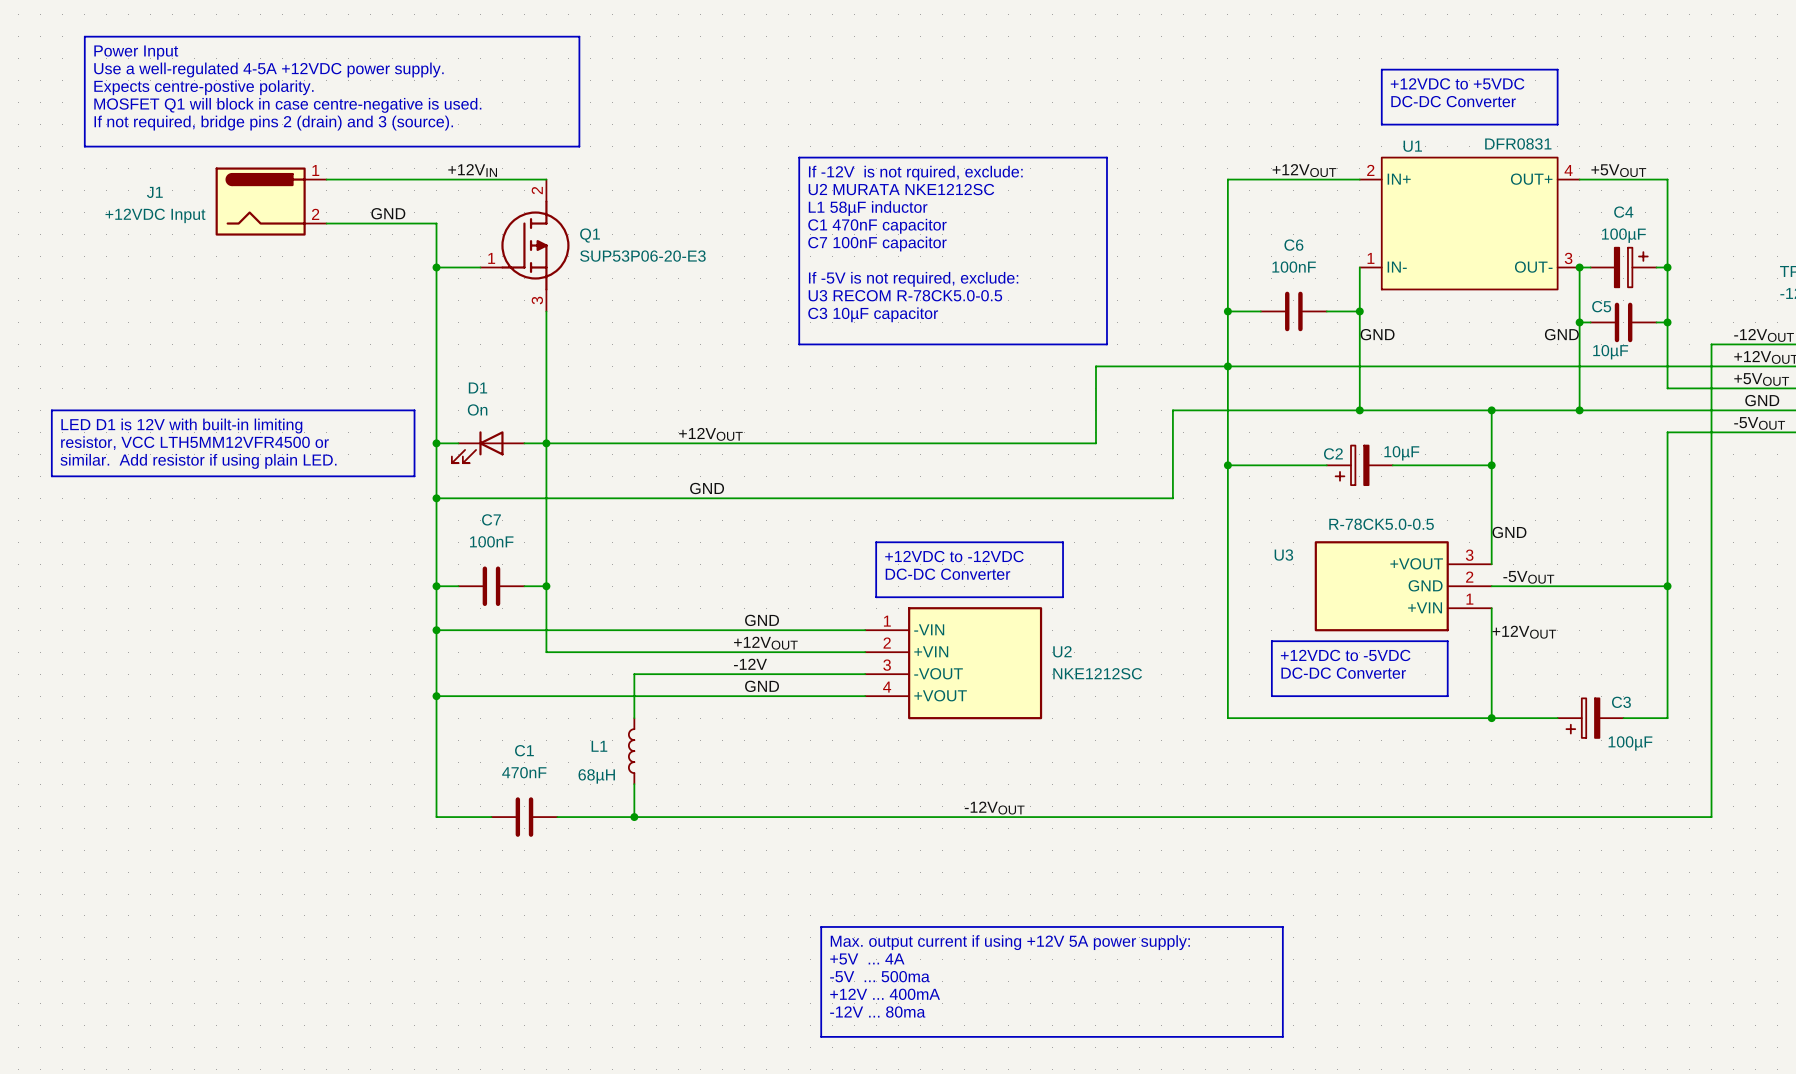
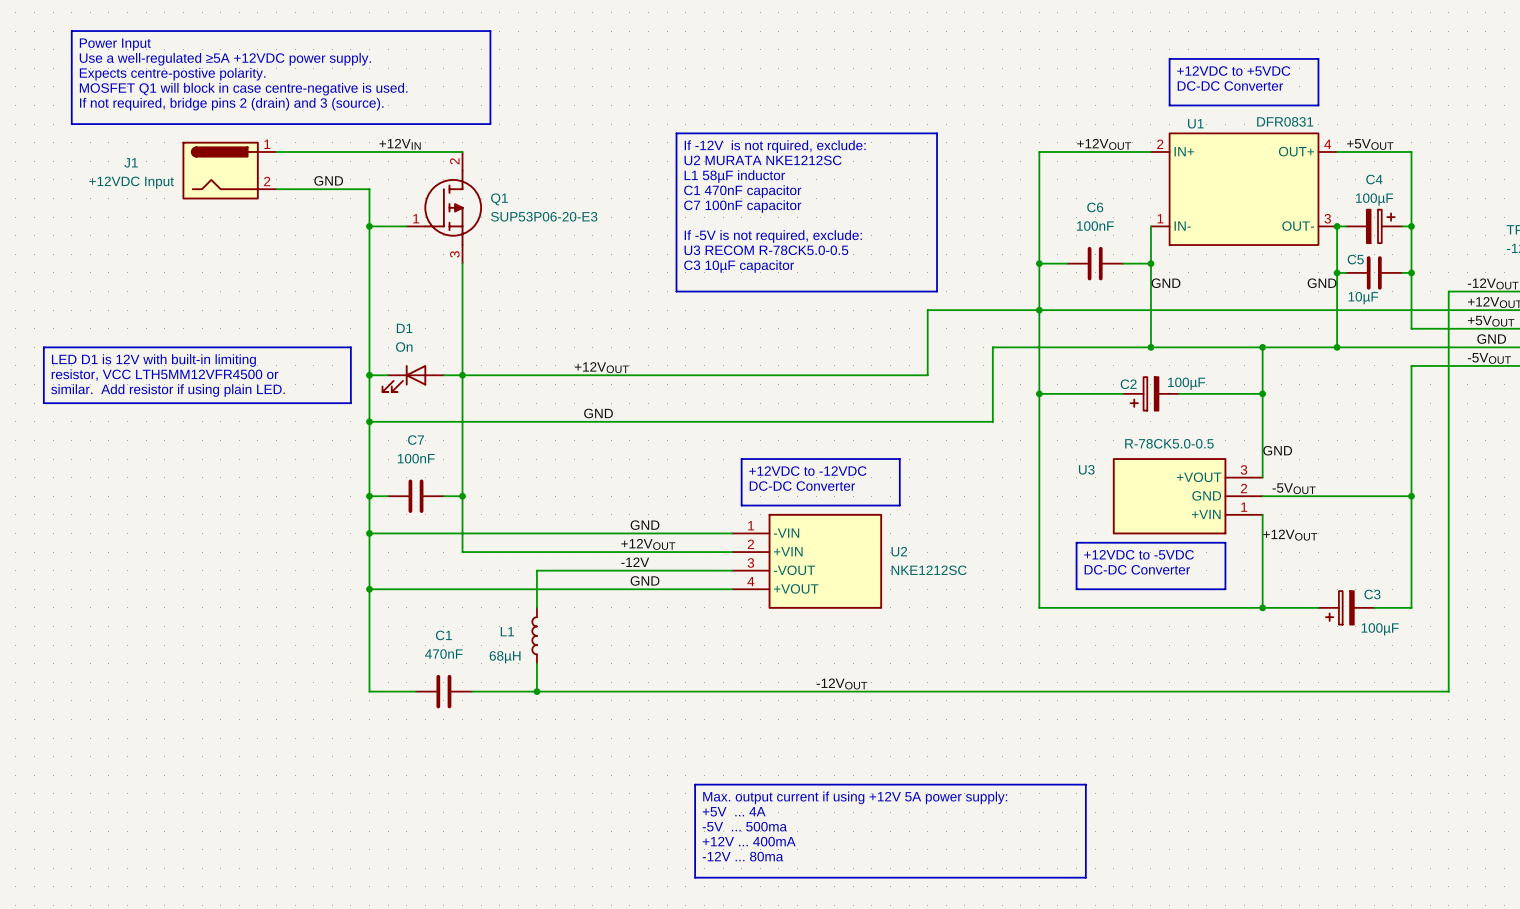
text: Use a well-regulated 4-5A +12VDC power supply. (268, 69) -> Use a well-regulated ≥5A +12VDC power supply. (225, 59)
C2 value: 10µF (1401, 453) -> 100µF (1186, 383)

